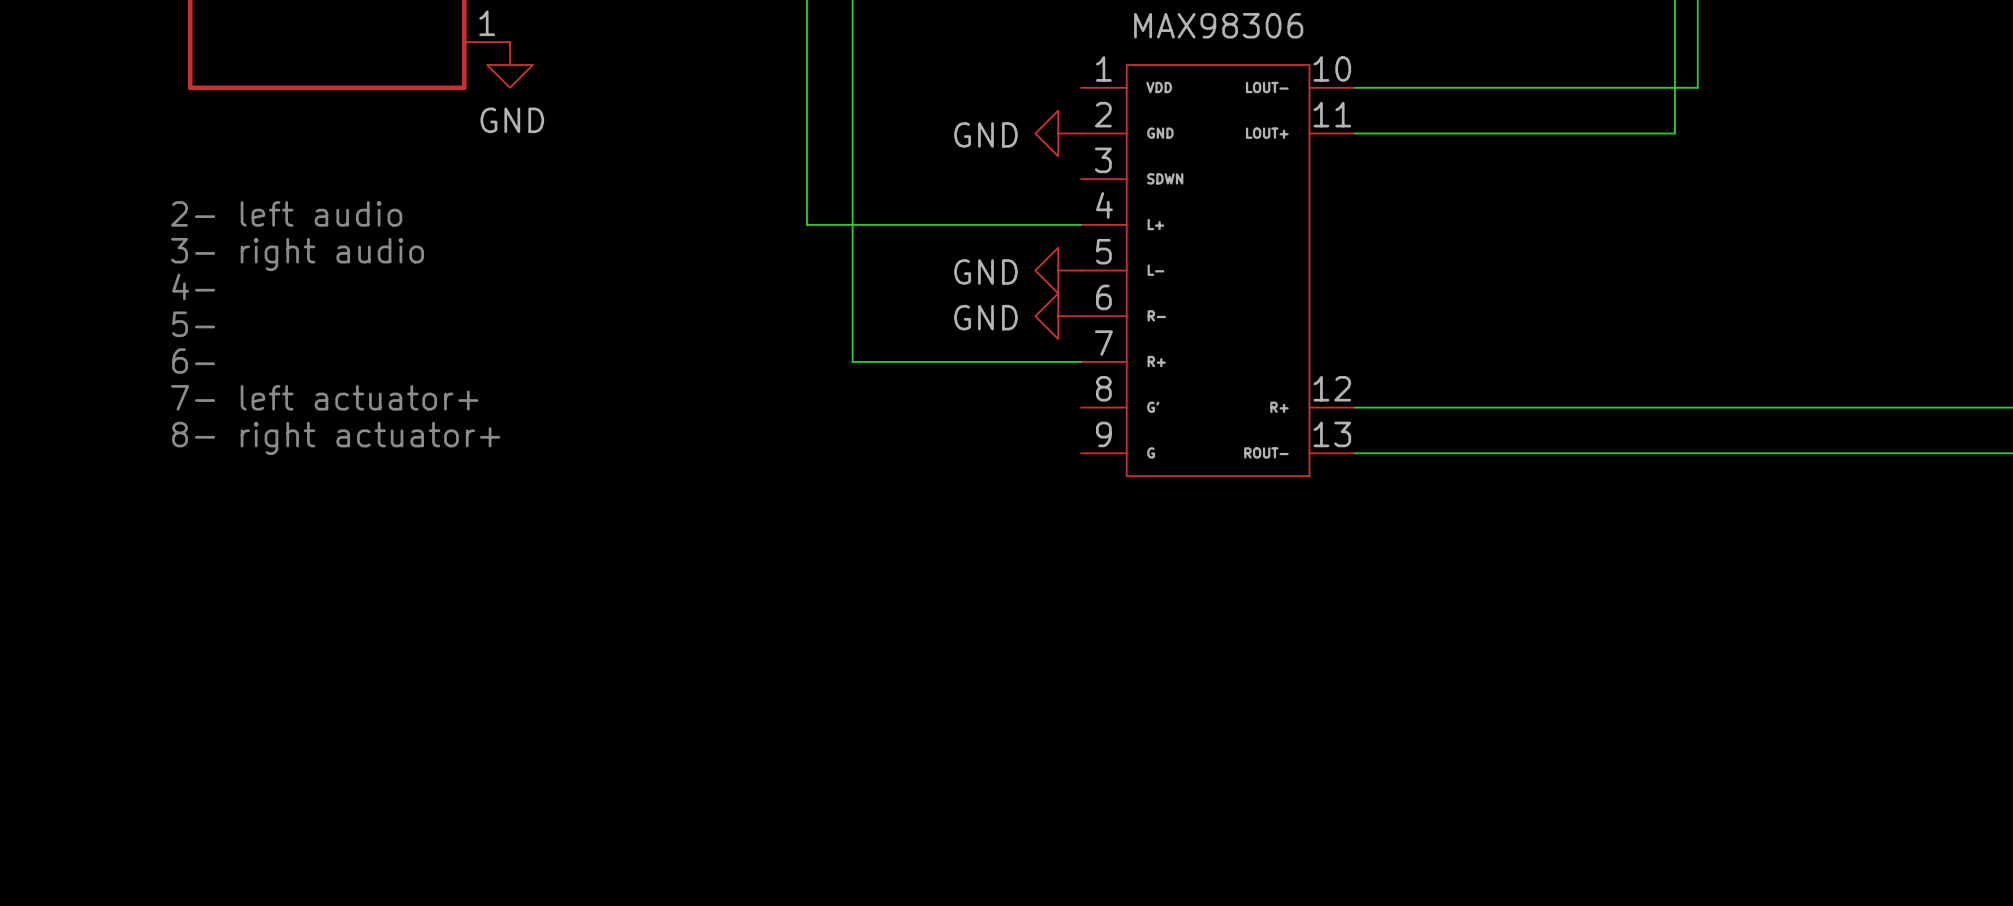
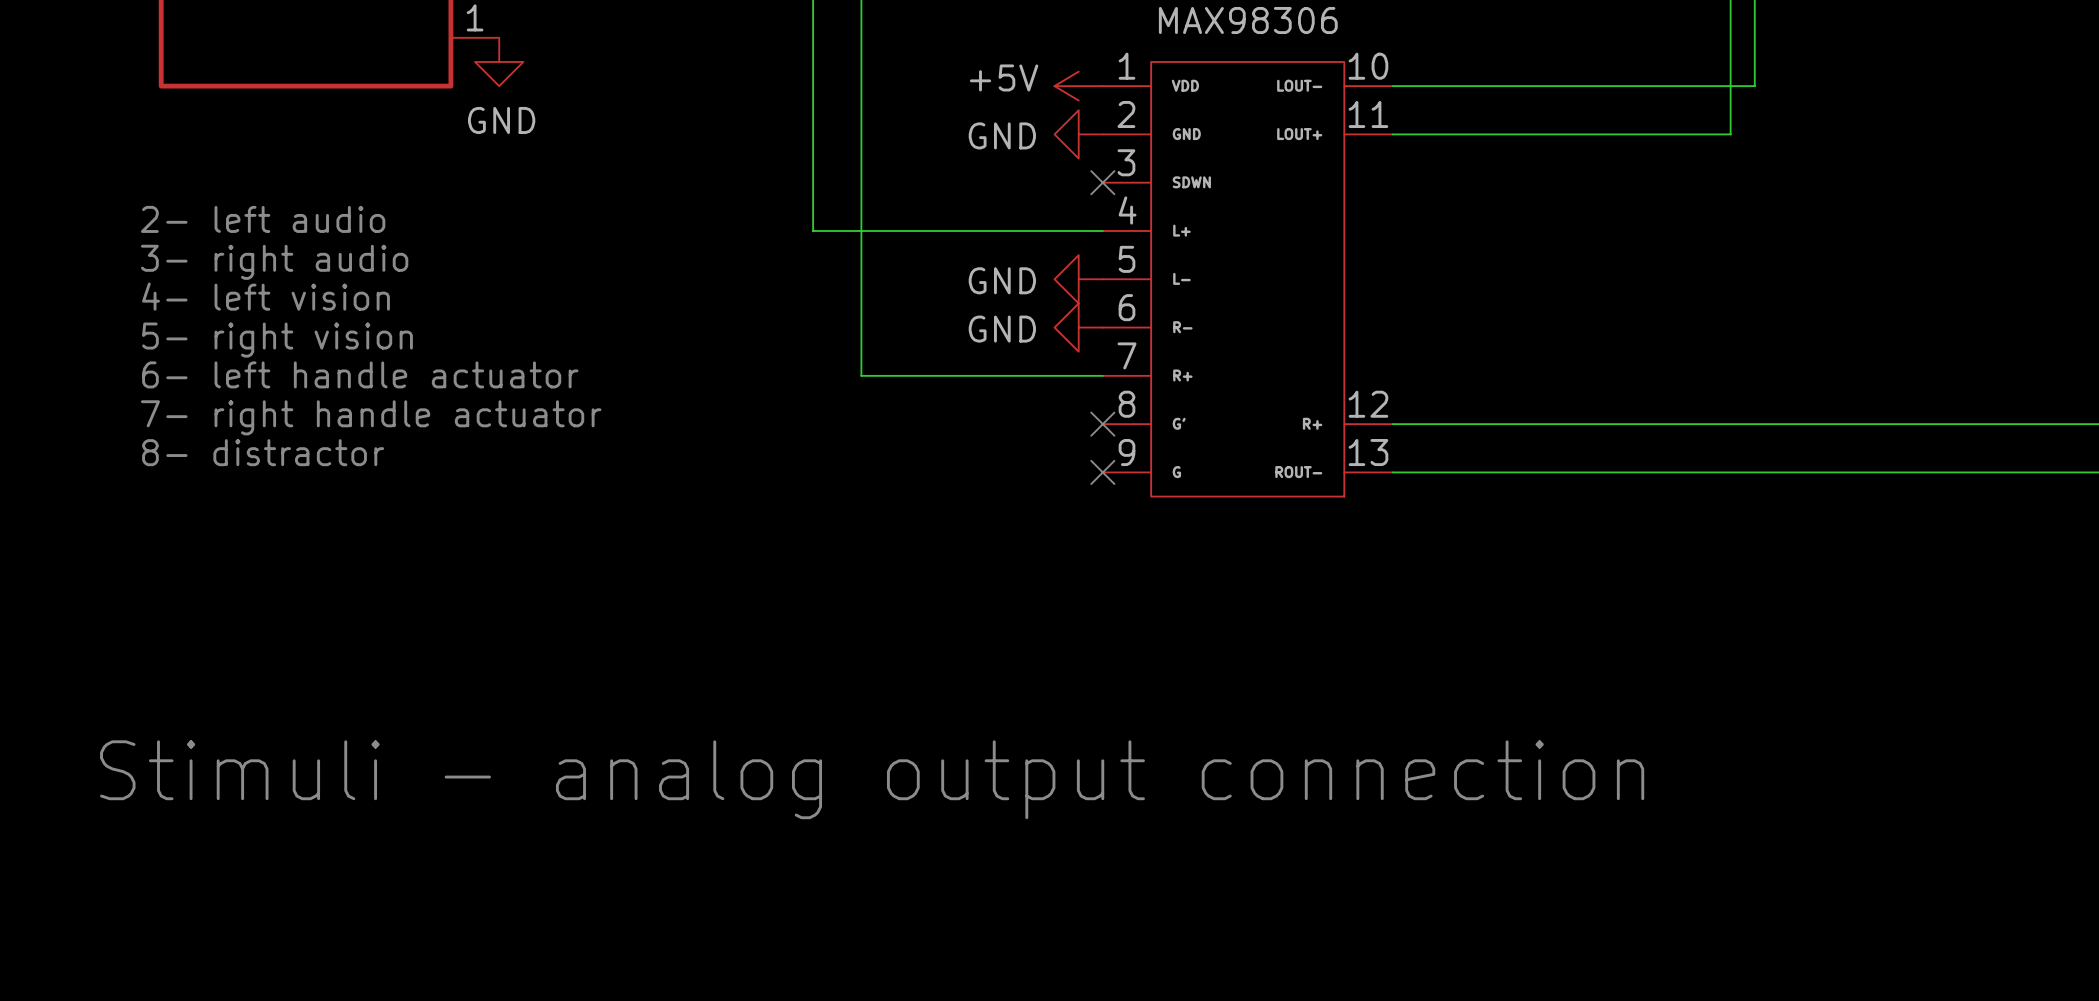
power symbol: none -> +5V (1078, 86)
no-connect mark: none -> (1102, 182)
text: 4- (193, 286) -> 4- left vision (266, 296)
text: 5- (193, 324) -> 5- right vision (277, 340)
text: 6- (193, 361) -> 6- left handle actuator (360, 374)
text: 7- left actuator+ (324, 397) -> 7- right handle actuator (371, 417)
no-connect mark: none -> (1102, 424)
text: 8- right actuator+ (336, 438) -> 8- distractor (263, 452)
no-connect mark: none -> (1102, 472)
text: none -> Stimuli - analog output connection (872, 779)

